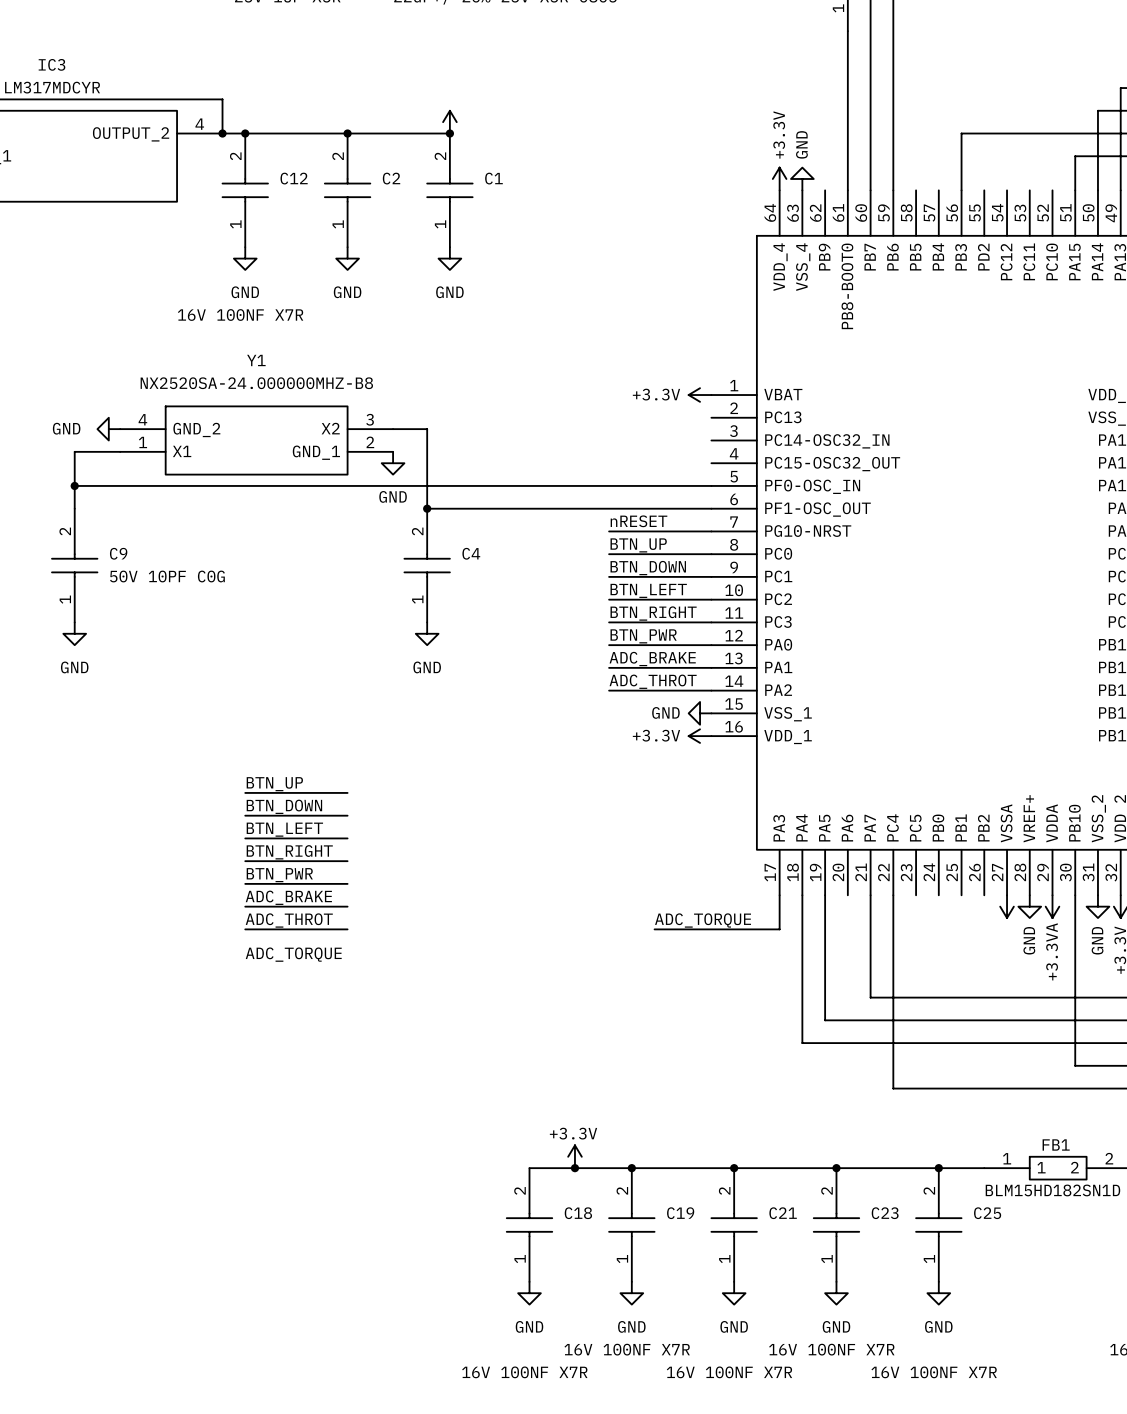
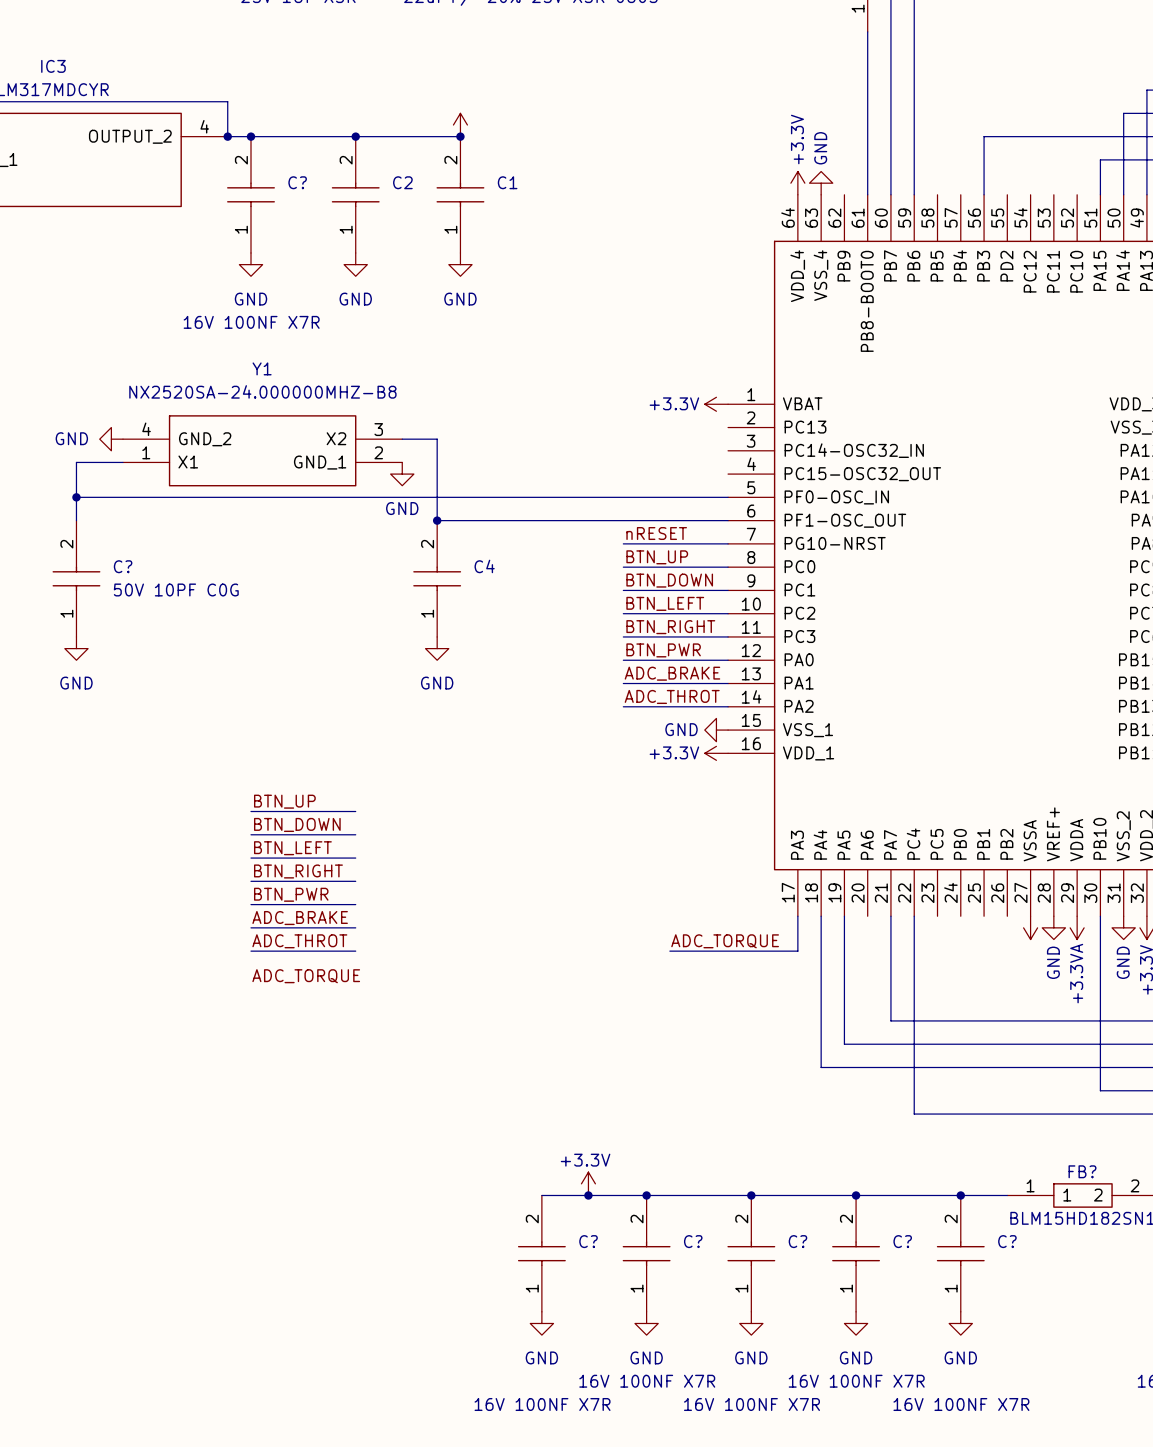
C12 name: C12 (294, 178) -> C? (297, 182)
C9 name: C9 (118, 553) -> C? (123, 566)
FB1 name: FB1 (1056, 1144) -> FB? (1082, 1171)
C18 name: C18 (578, 1213) -> C? (588, 1241)
C19 name: C19 (680, 1213) -> C? (693, 1241)
C21 name: C21 (783, 1213) -> C? (797, 1241)
C23 name: C23 (885, 1213) -> C? (902, 1241)
C25 name: C25 (987, 1213) -> C? (1007, 1241)

